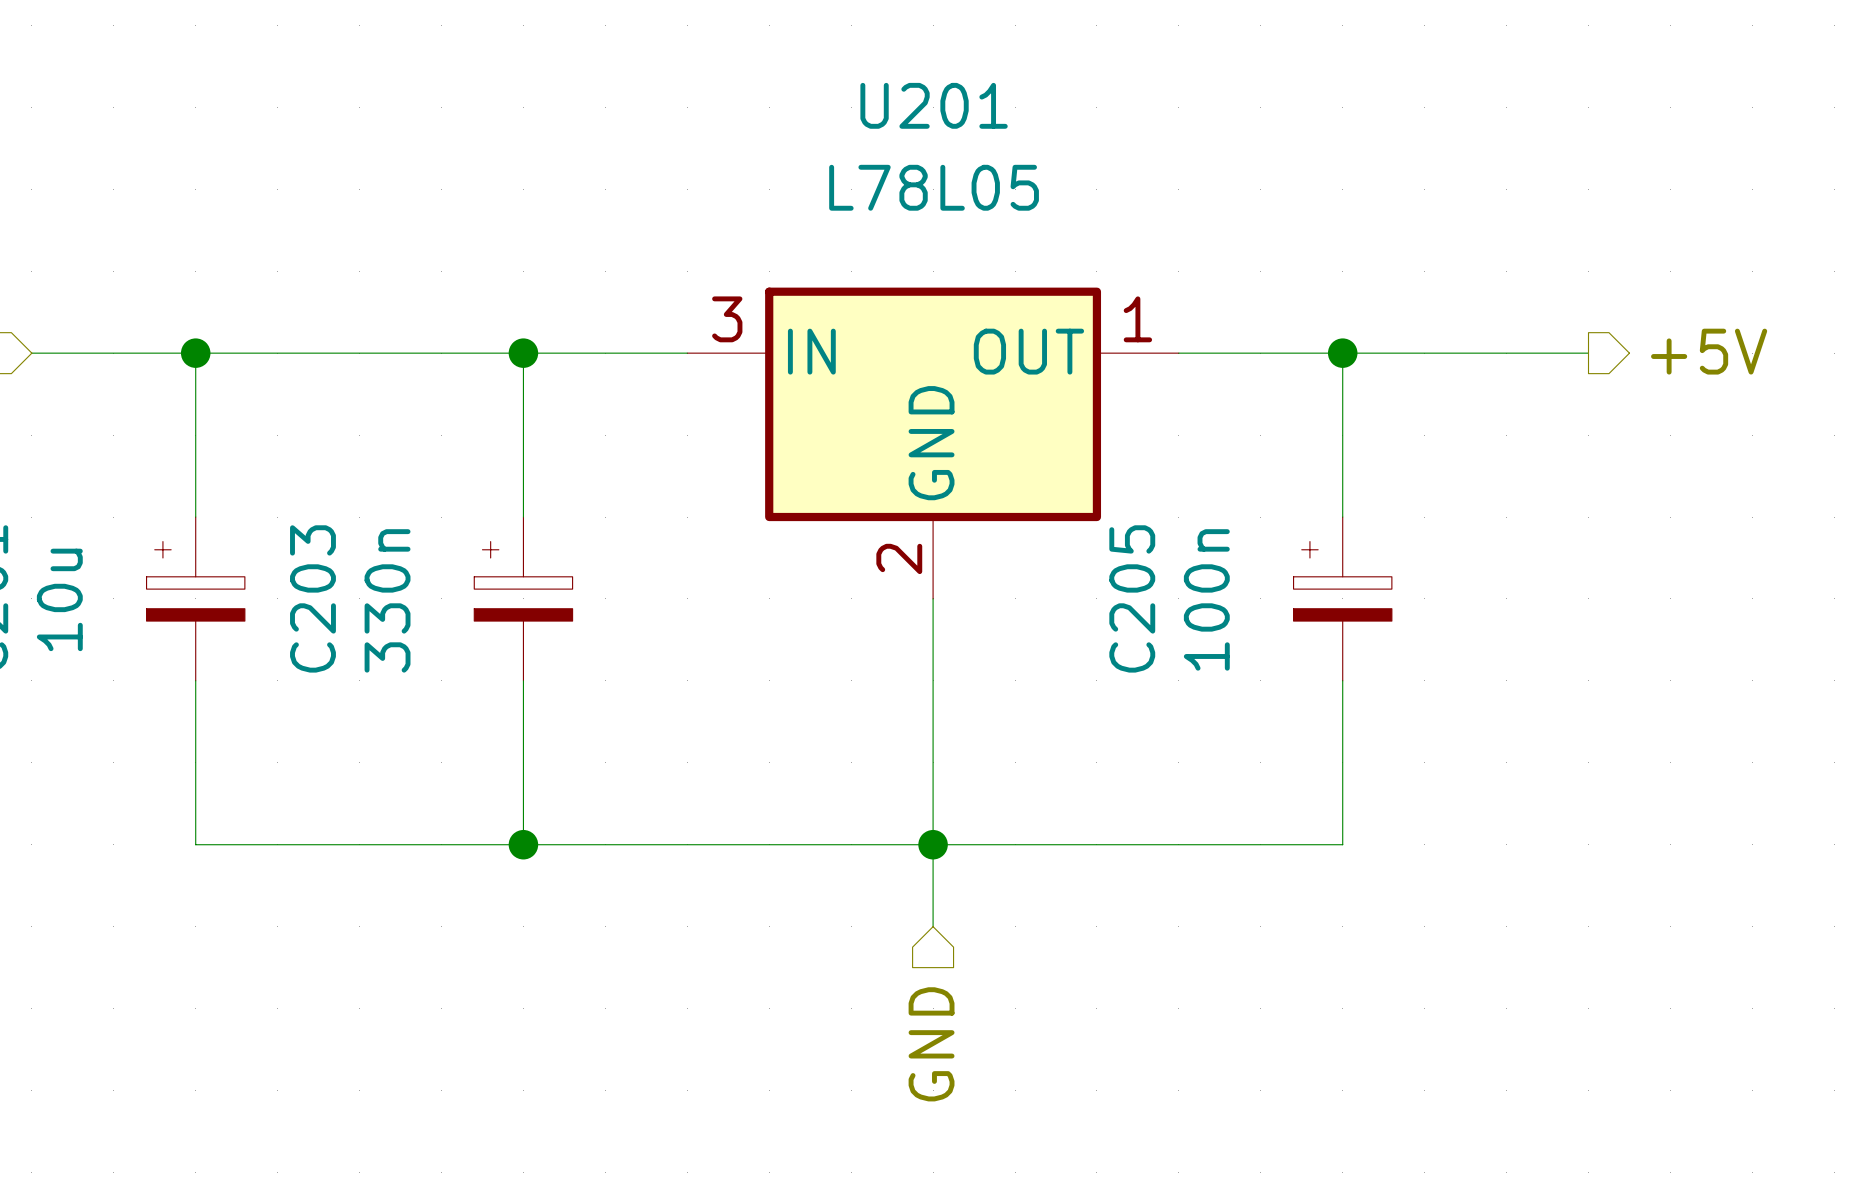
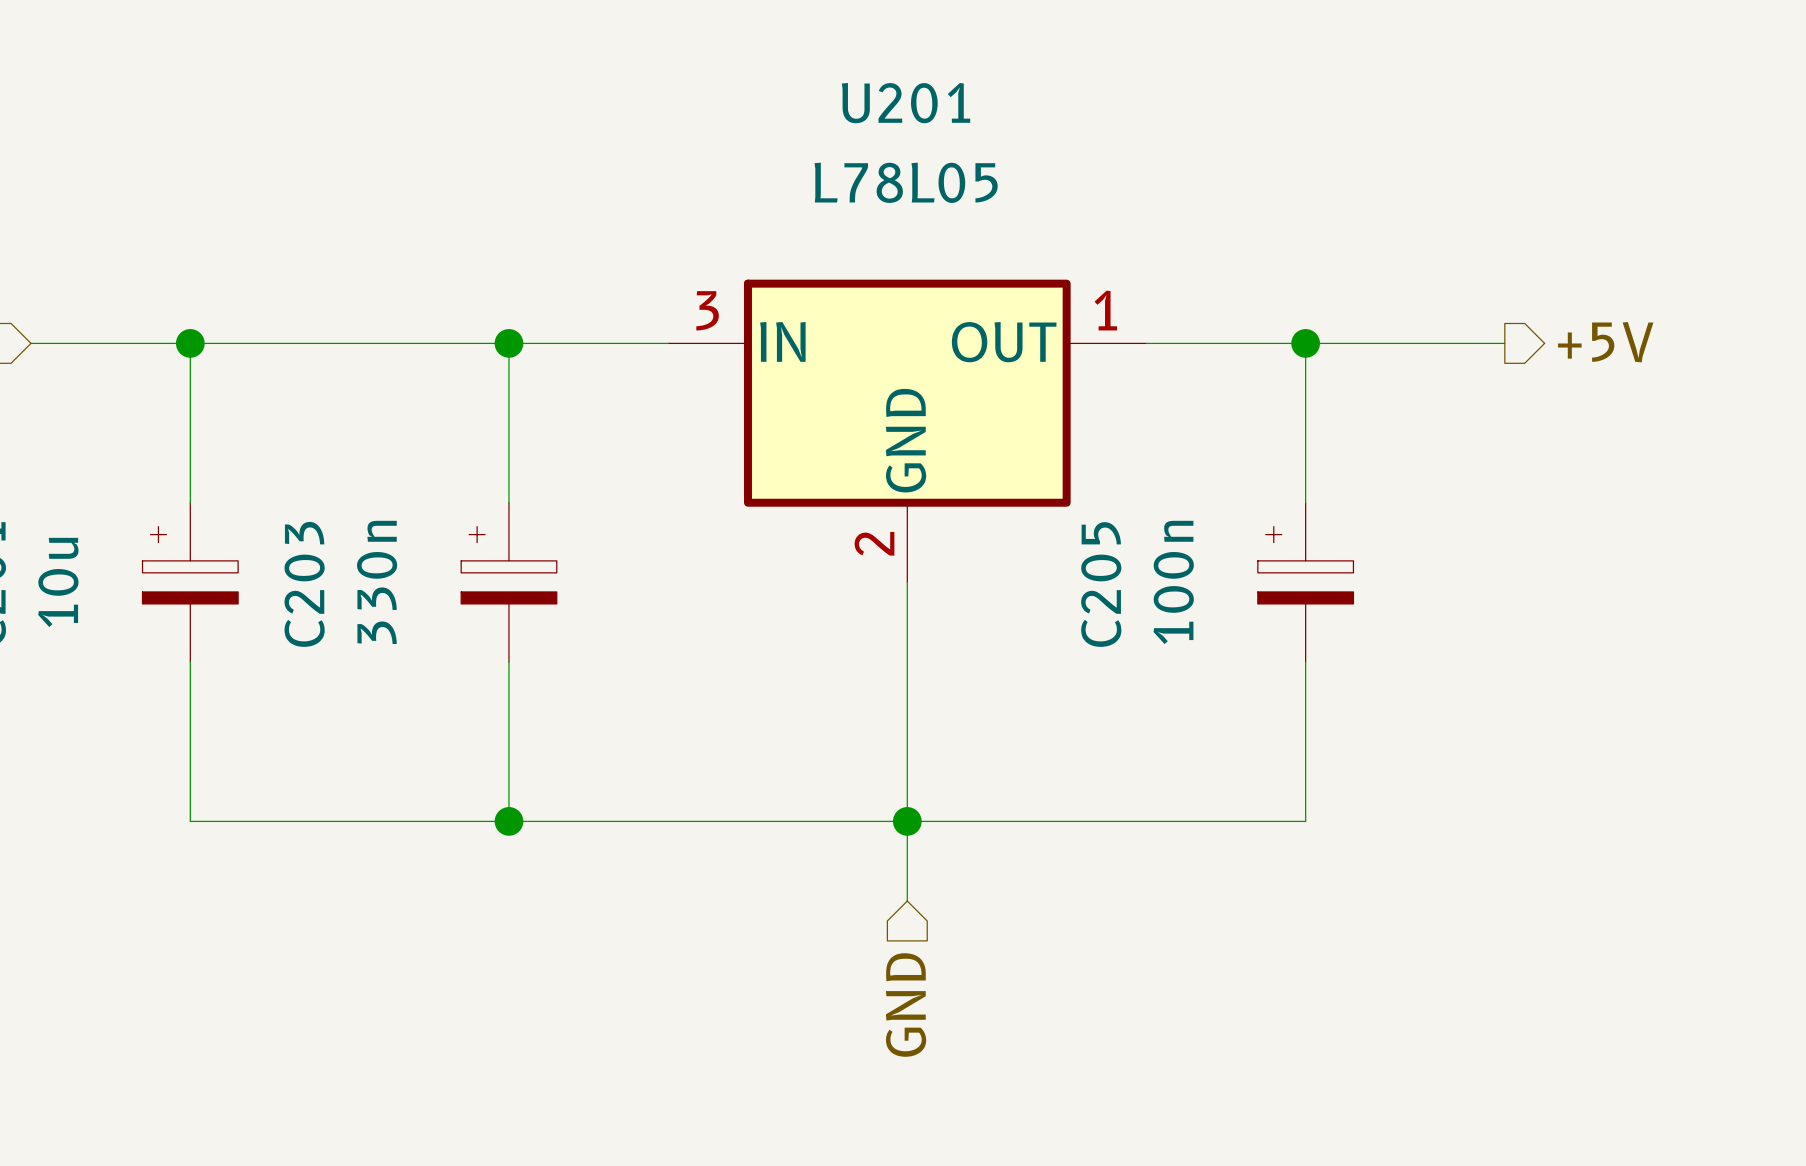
hierarchical label position: +5V (1709, 351) -> +5V (1605, 342)
wire: (1547, 353) (1588, 353) -> none

